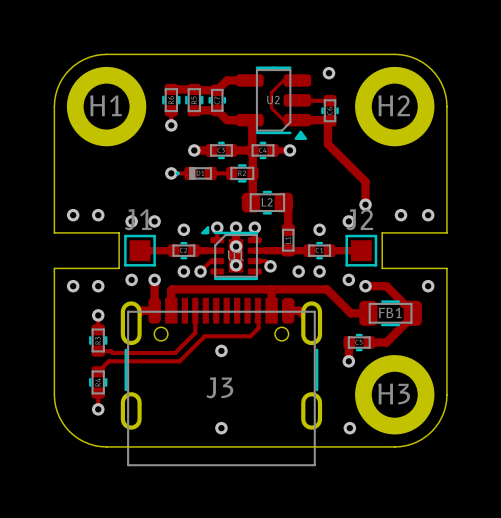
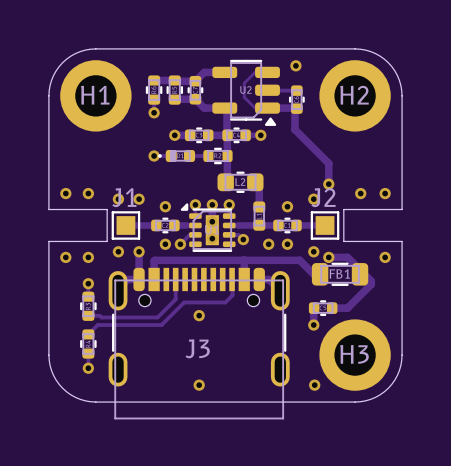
track: (326, 289) (350, 313) (368, 313) -> (294, 260) (299, 260) (313, 274) (320, 274)
FB1 position: (390, 313) -> (340, 274)

